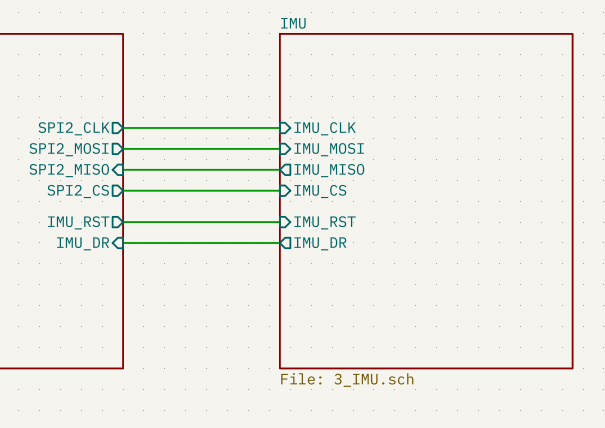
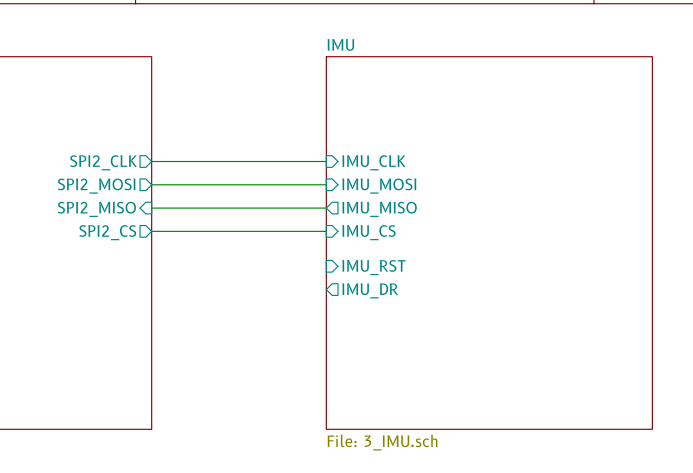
sheet pin: IMU_RST (78, 222) -> none
wire: (123, 222) (279, 222) -> none
wire: (123, 242) (279, 242) -> none
sheet pin: IMU_DR (83, 243) -> none

